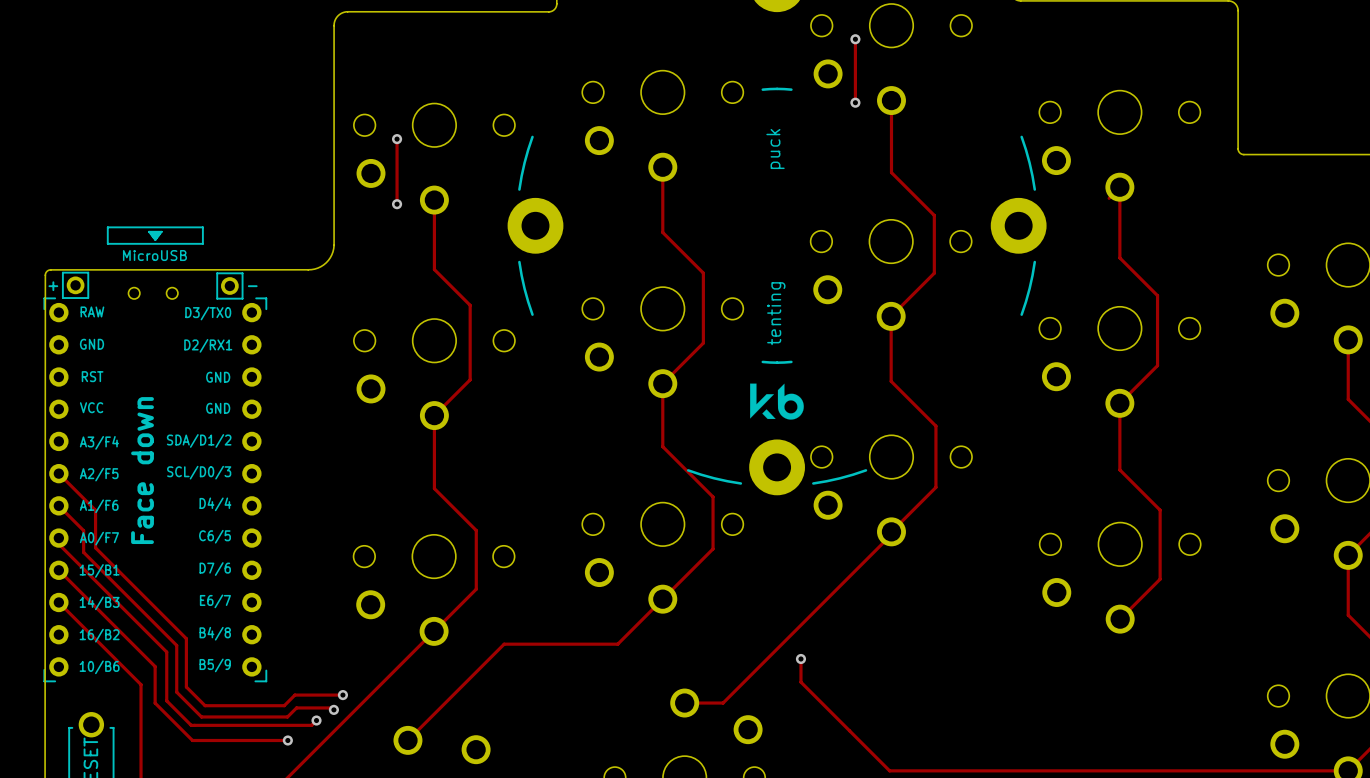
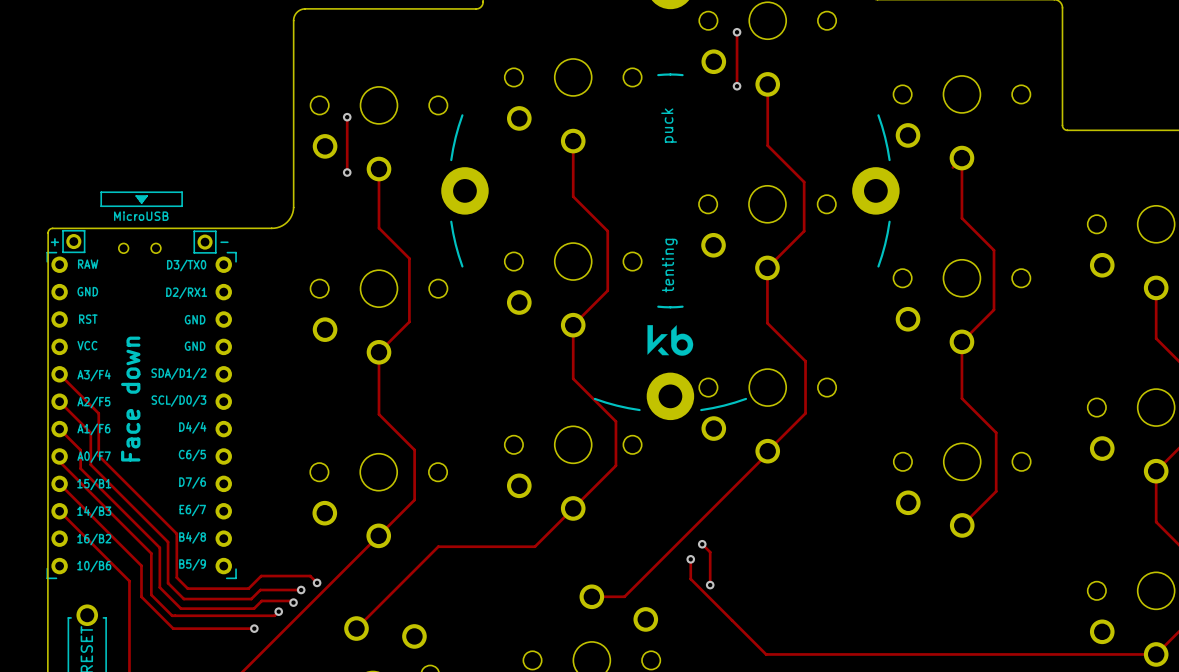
track: none -> (59, 374) (98, 413) (98, 455) (176, 533) (176, 577) (187, 588) (248, 588) (261, 576) (310, 576) (317, 582)
track: none -> (702, 544) (710, 552) (710, 585)
via: none -> (702, 544)
via: none -> (317, 582)
via: none -> (710, 585)

